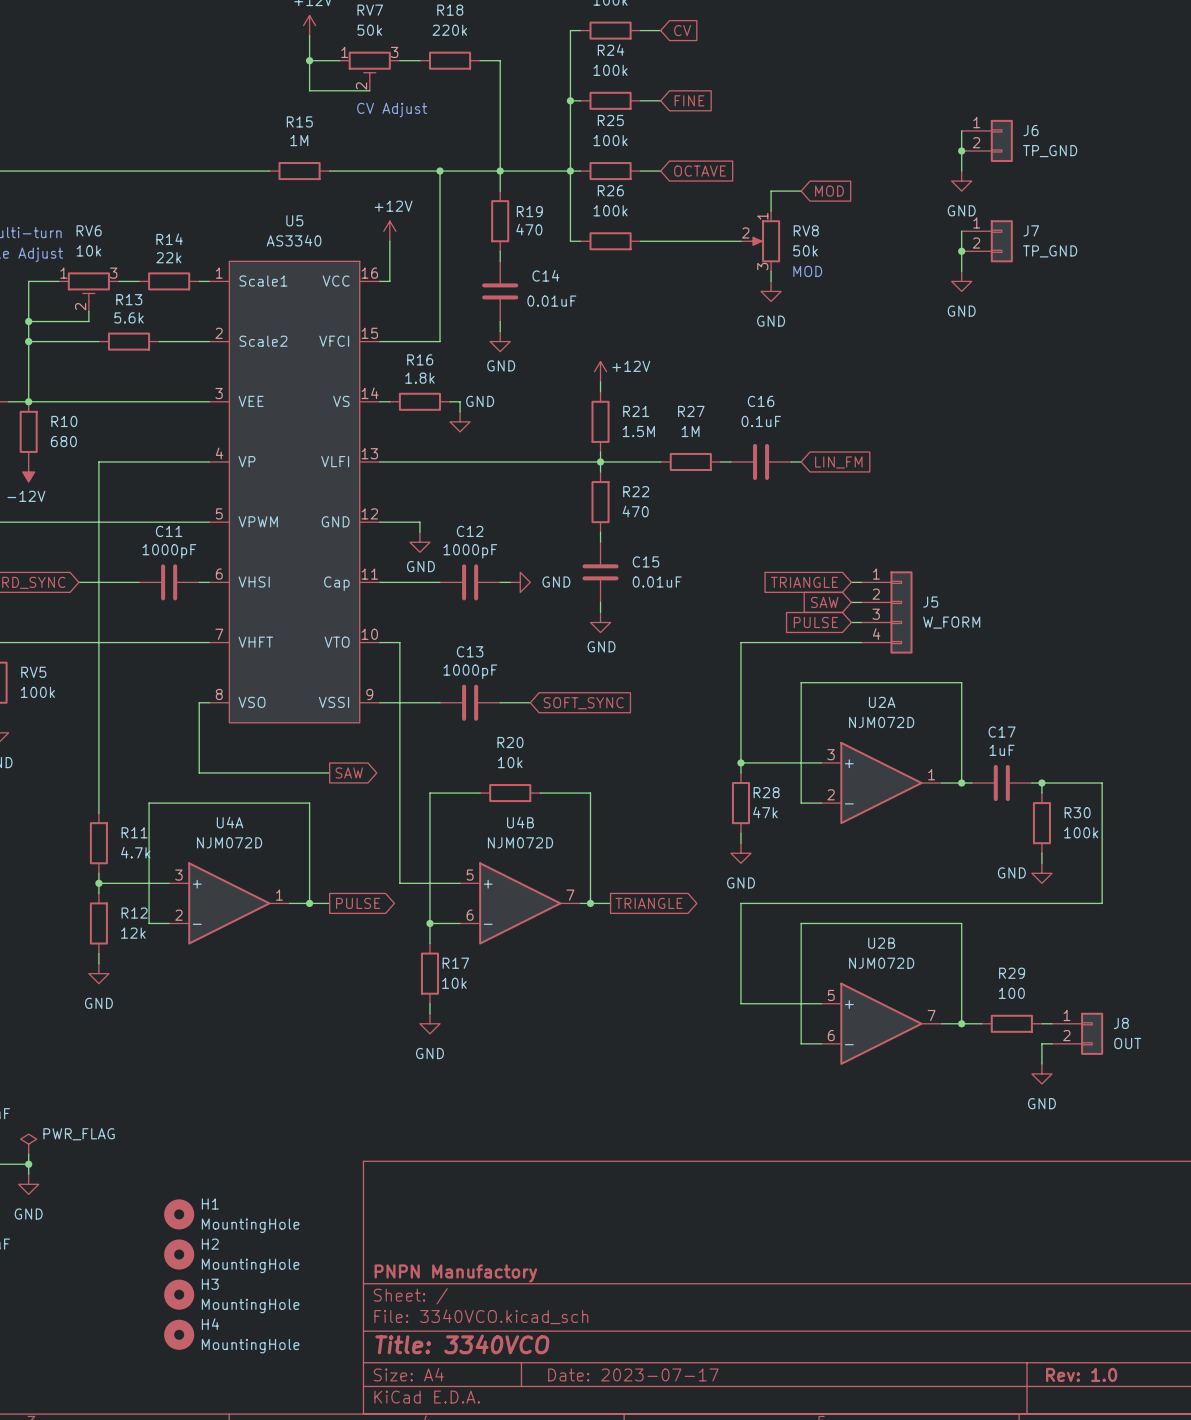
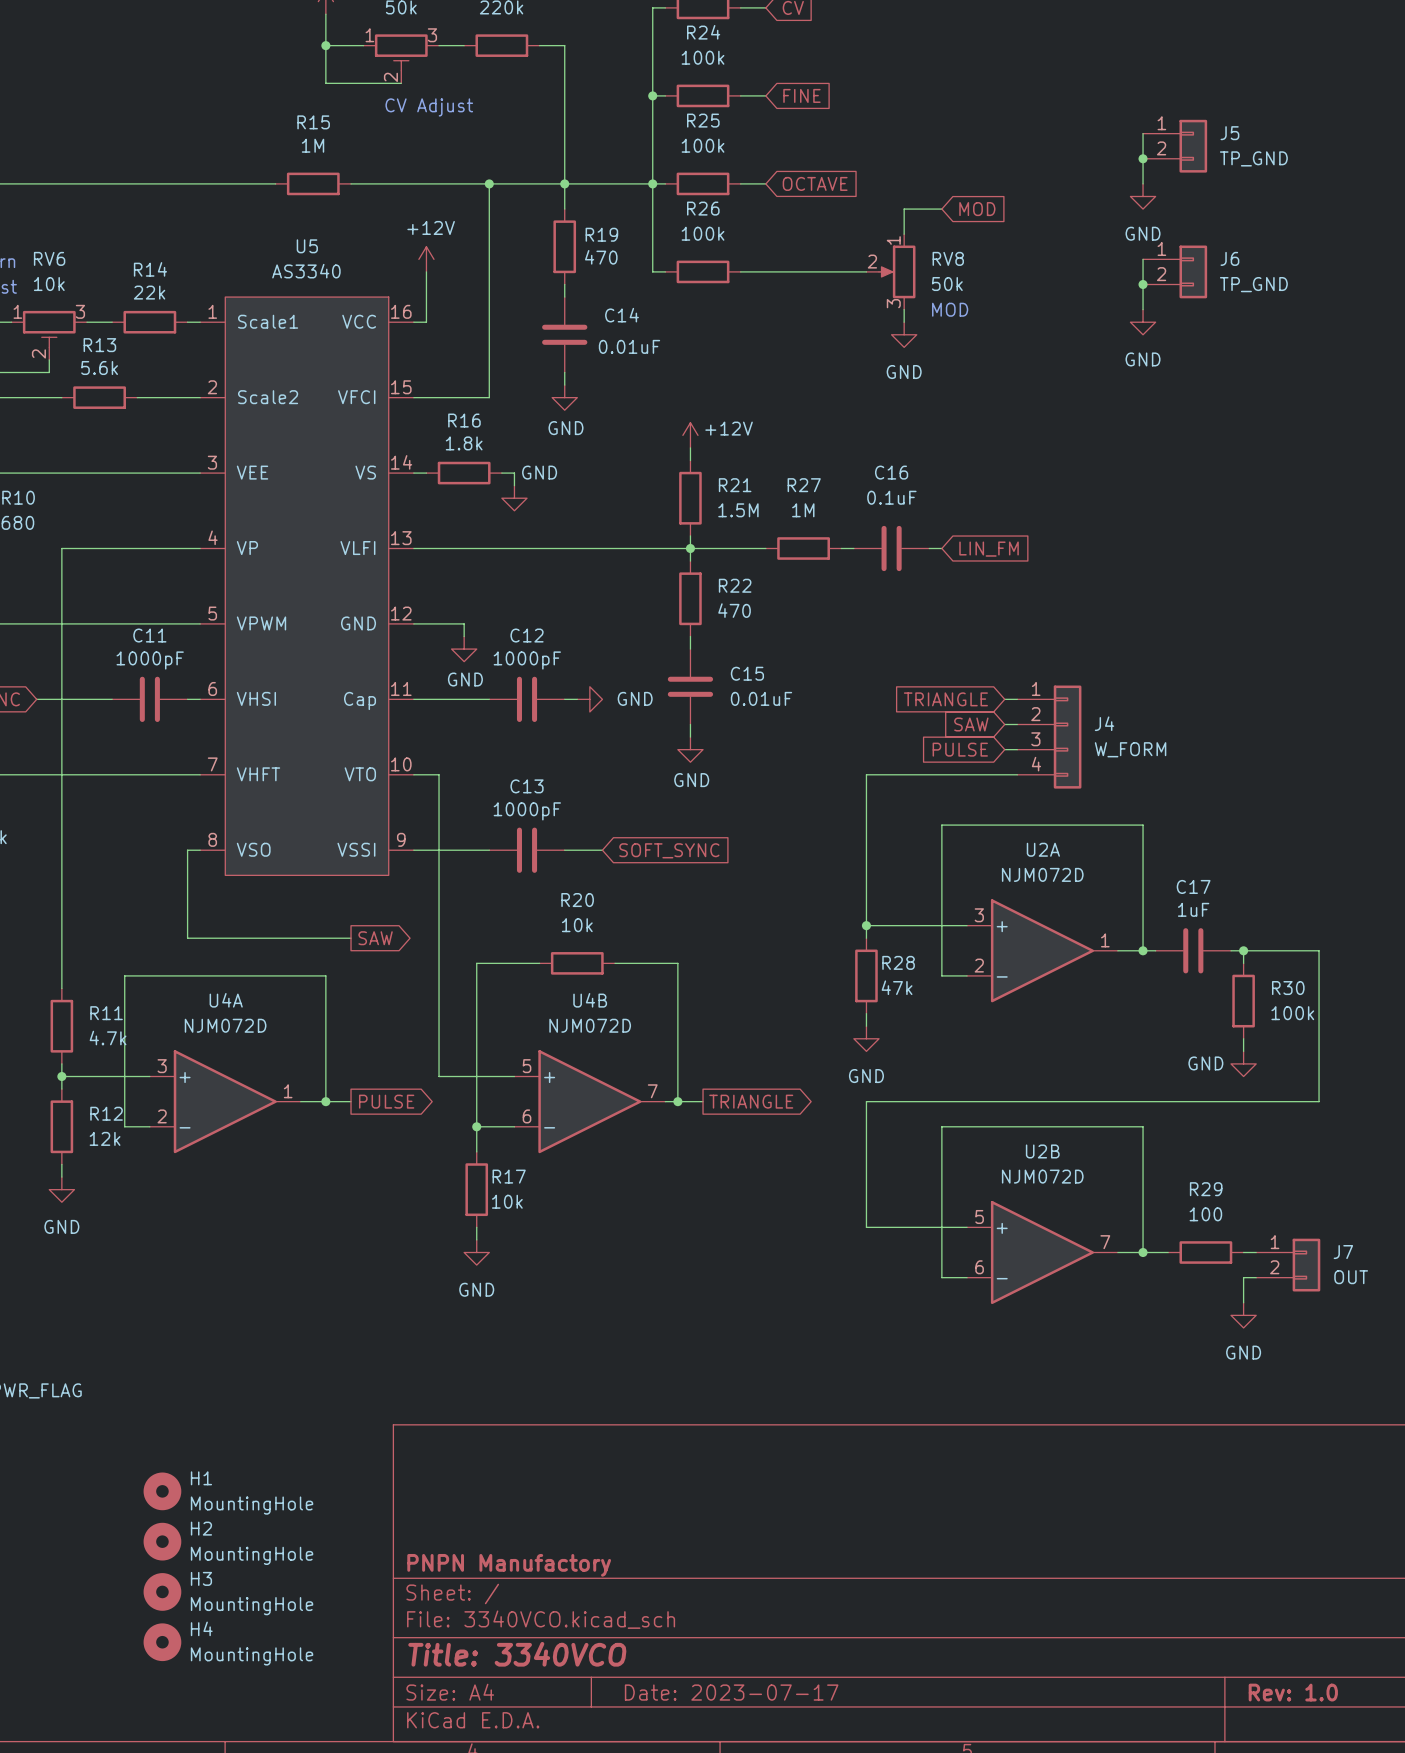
J6 name: J6 (1031, 130) -> J5 (1229, 133)
J7 name: J7 (1031, 230) -> J6 (1229, 258)
J5 name: J5 (930, 602) -> J4 (1104, 723)
J8 name: J8 (1121, 1023) -> J7 (1343, 1252)

